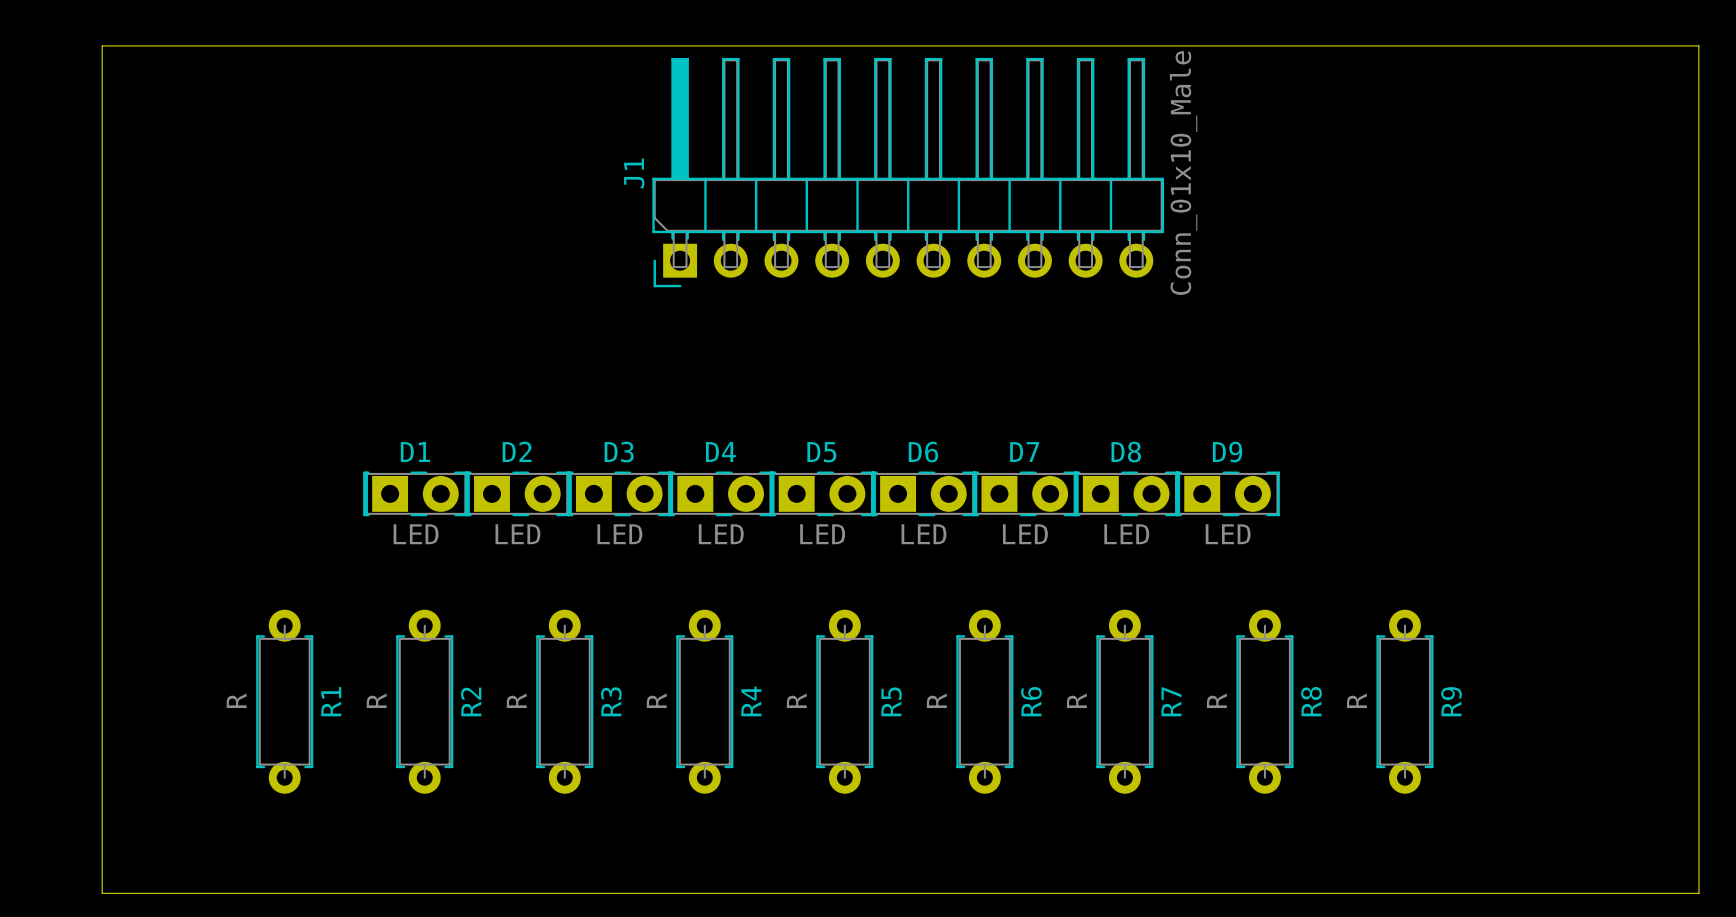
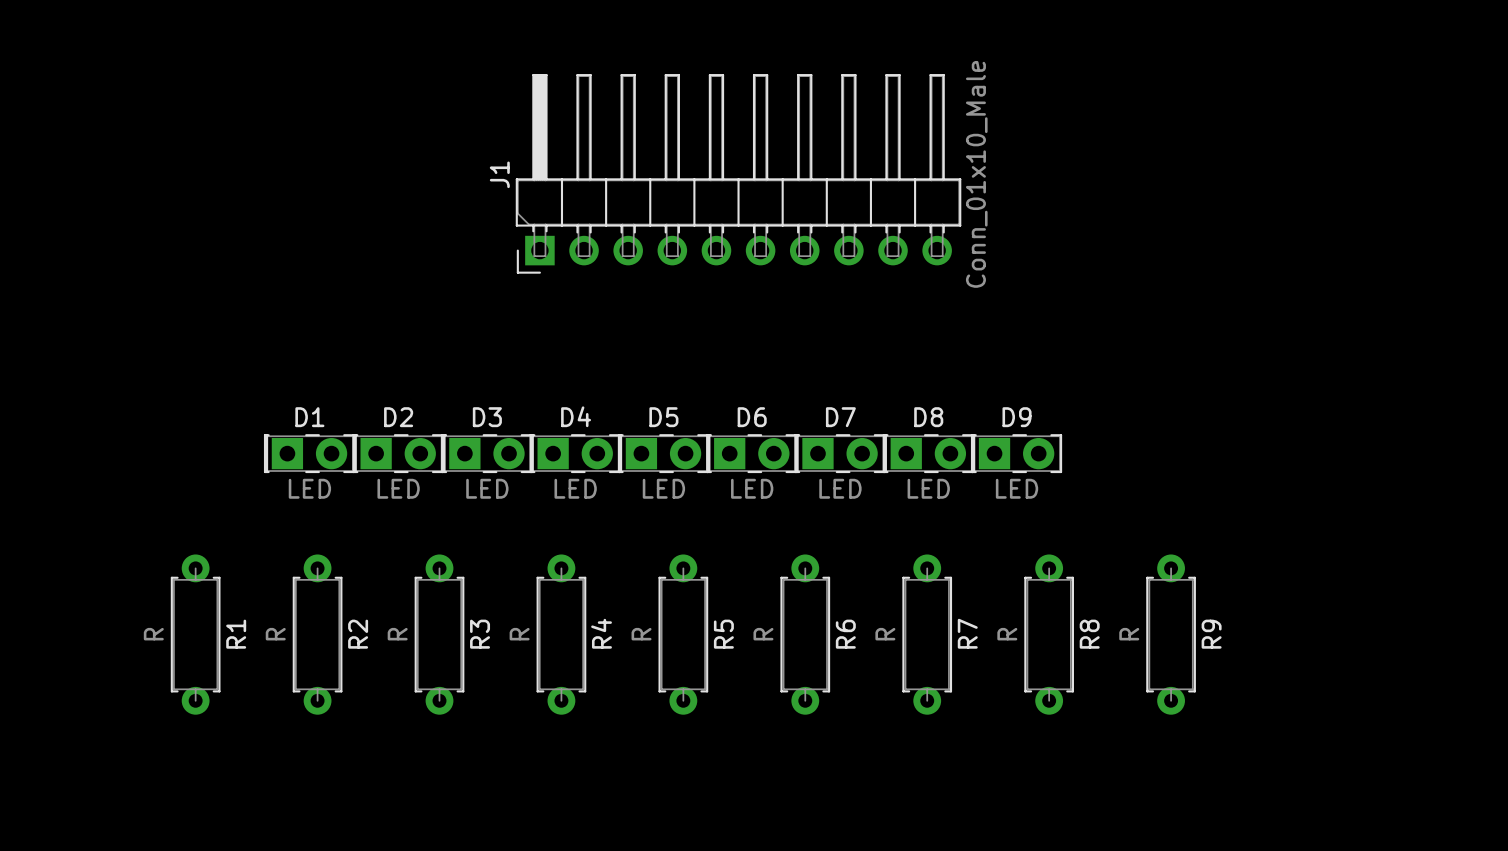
board edge: (102, 45) (102, 893) (1698, 893) (1698, 45) (102, 45) -> none

